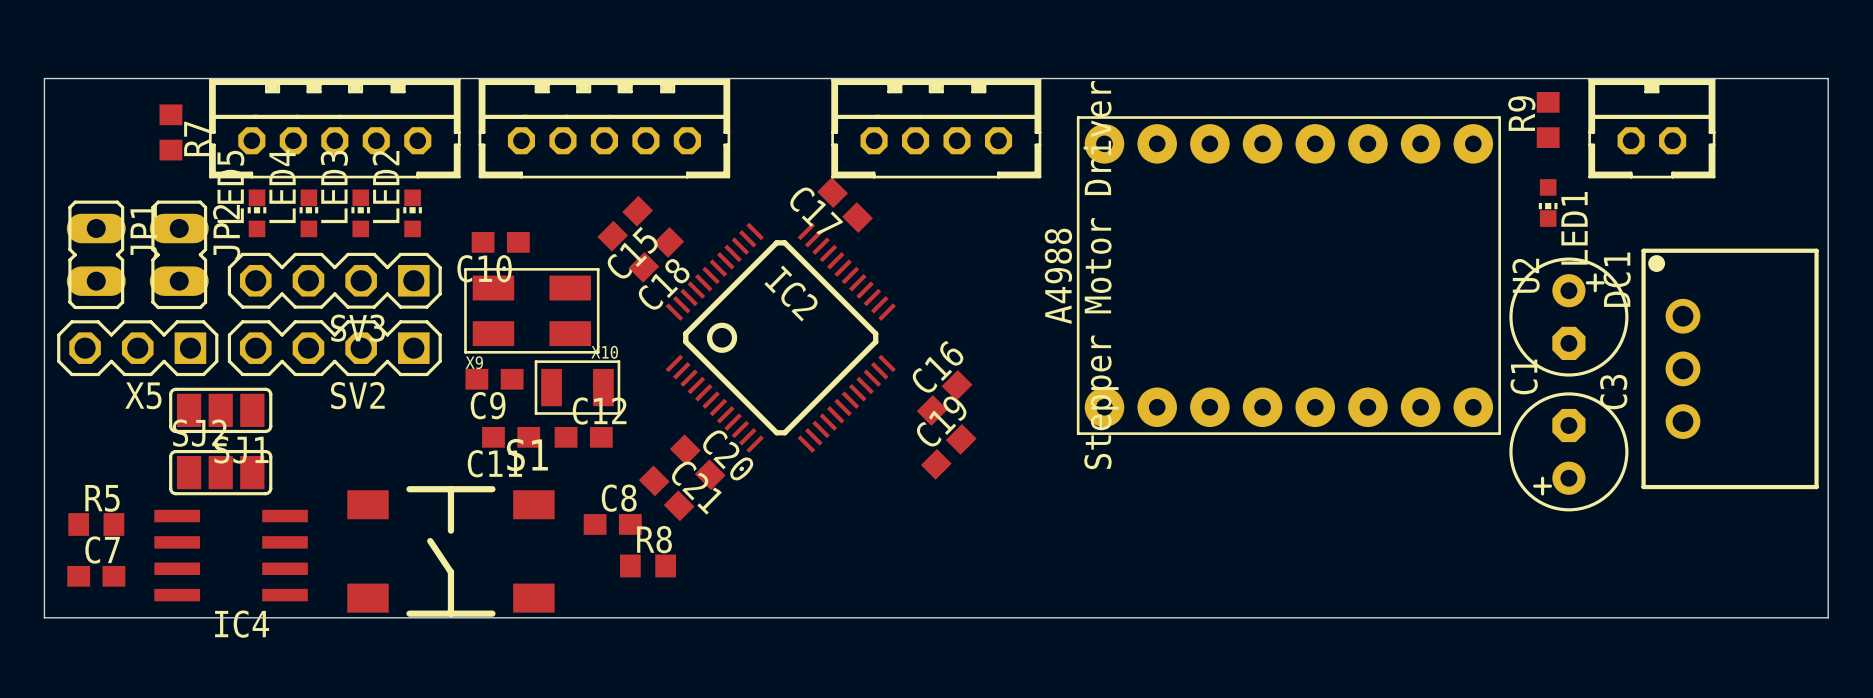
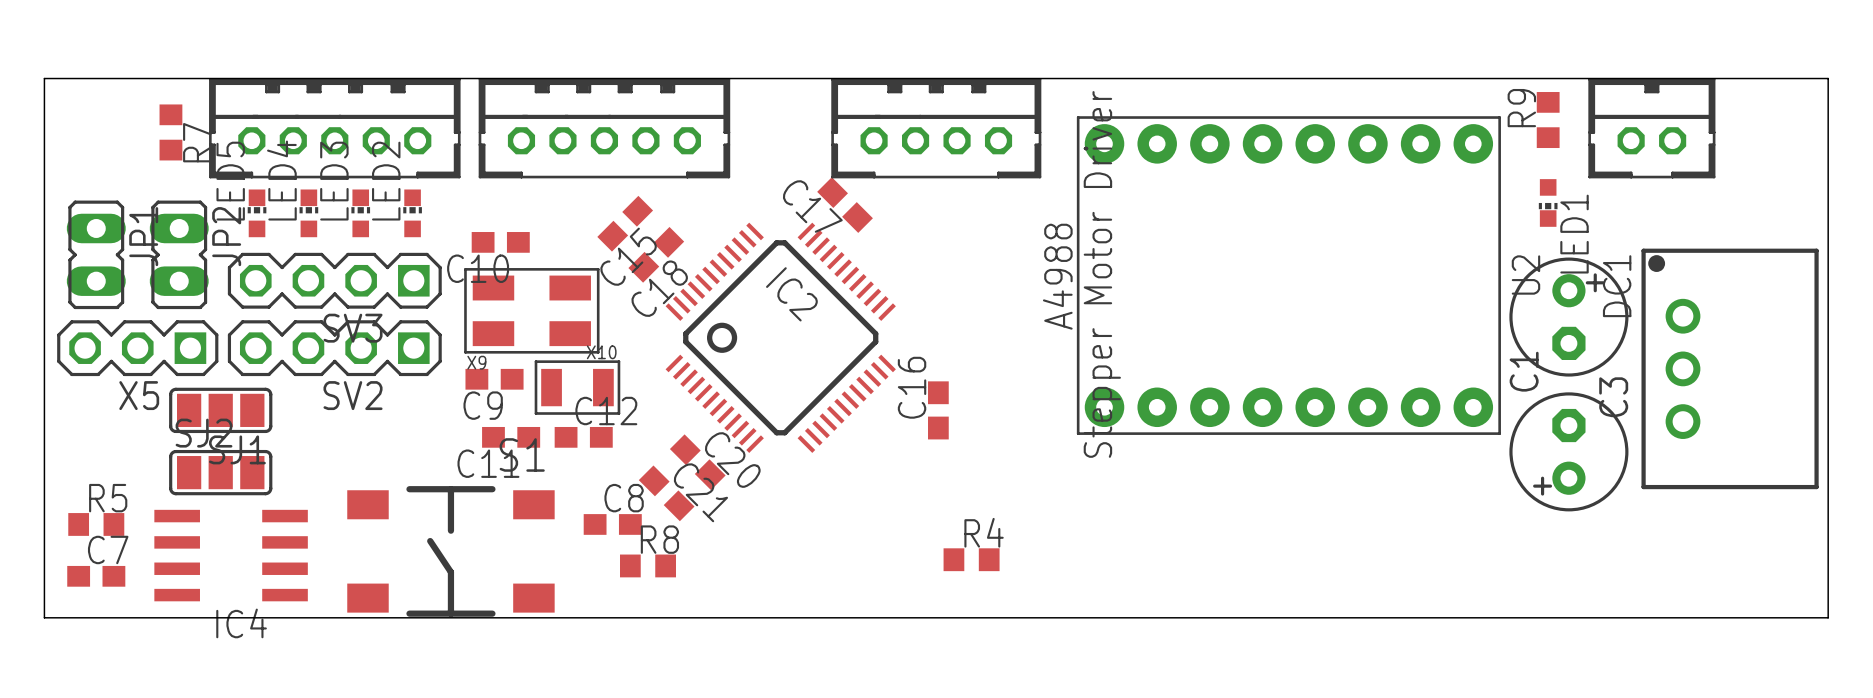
C16 rotation: 0° (944, 397) -> 45° counterclockwise (938, 410)
C19: (948, 451) -> none
R4: none -> (971, 559)

